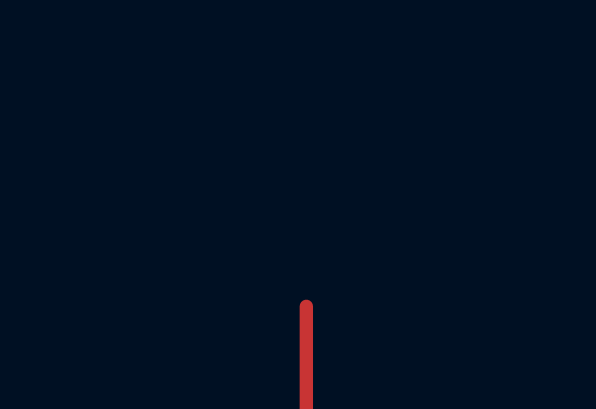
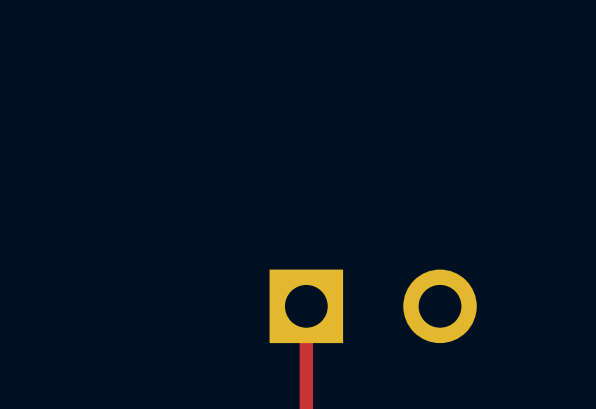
part: none -> (373, 306)

